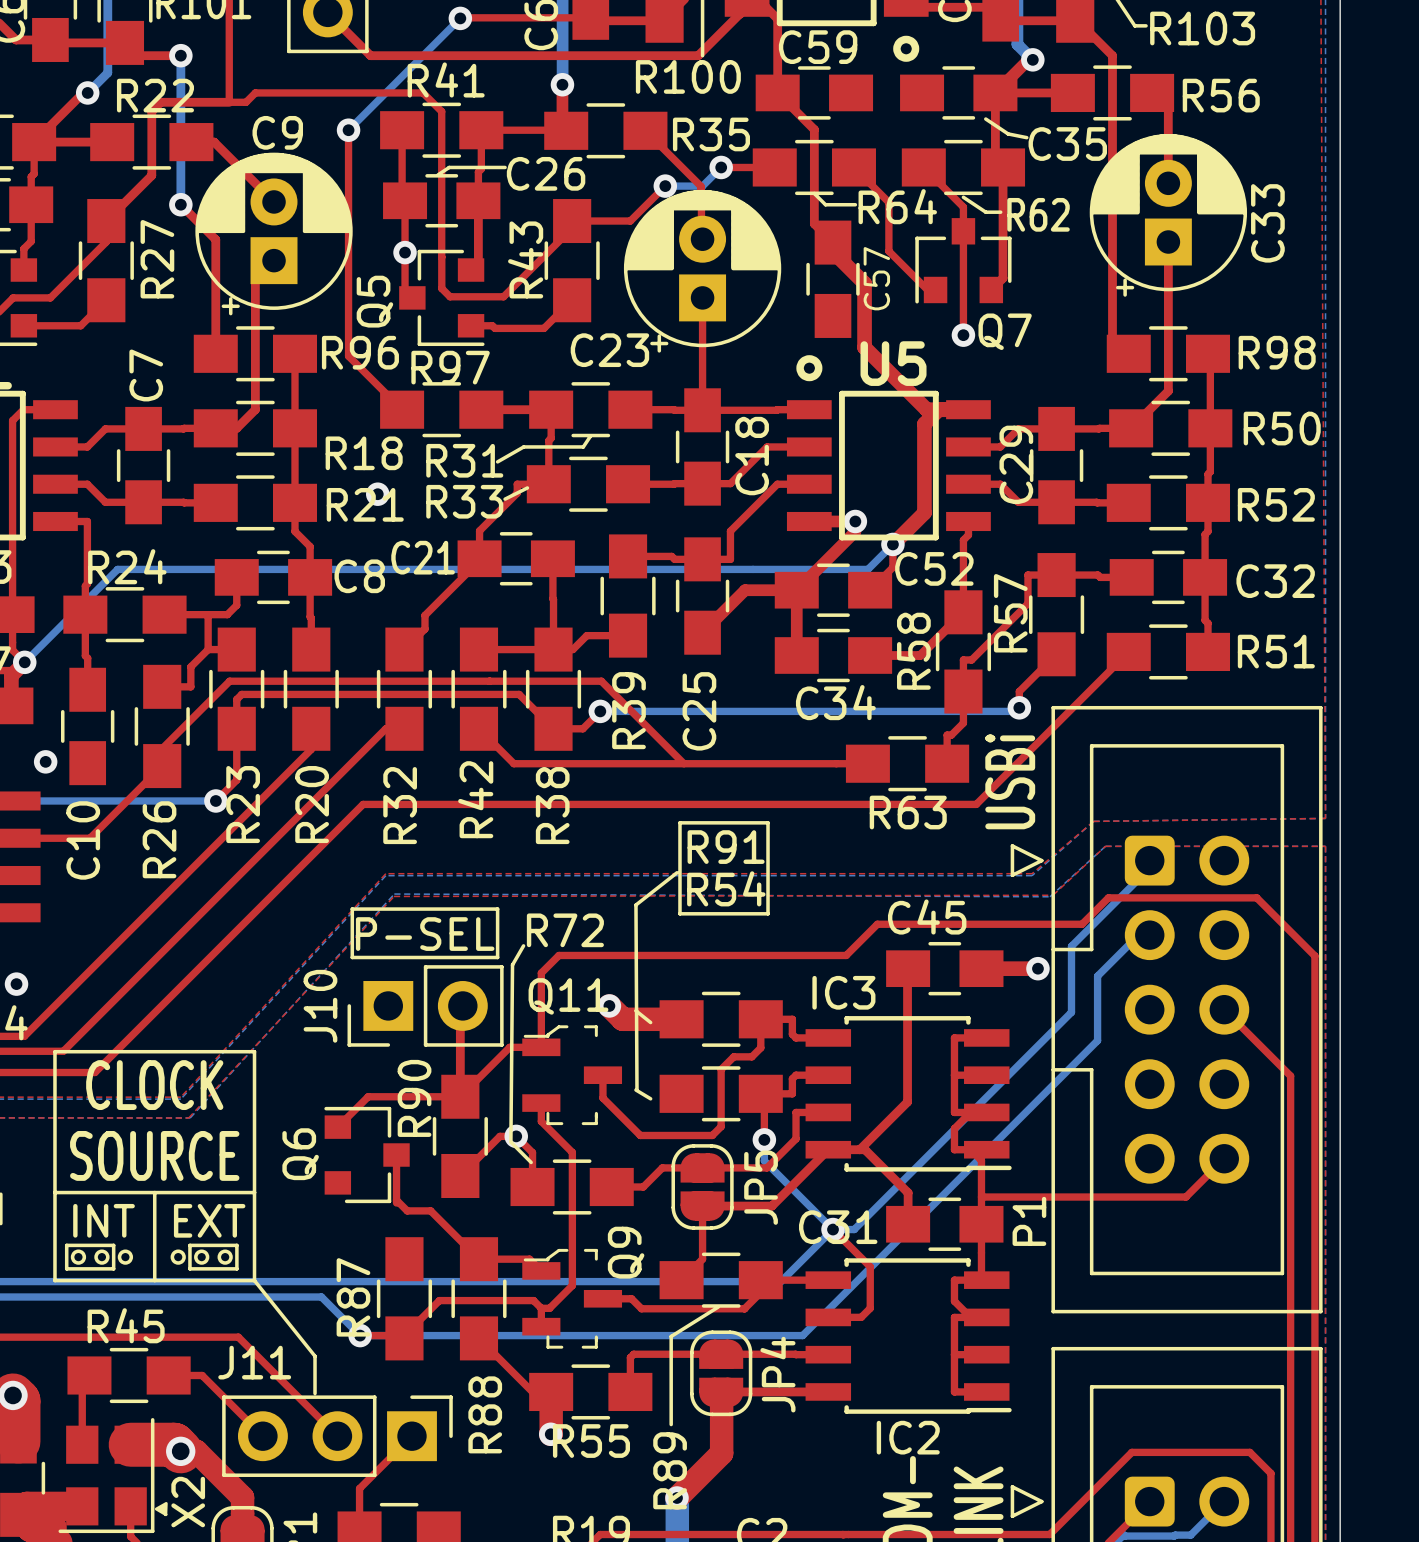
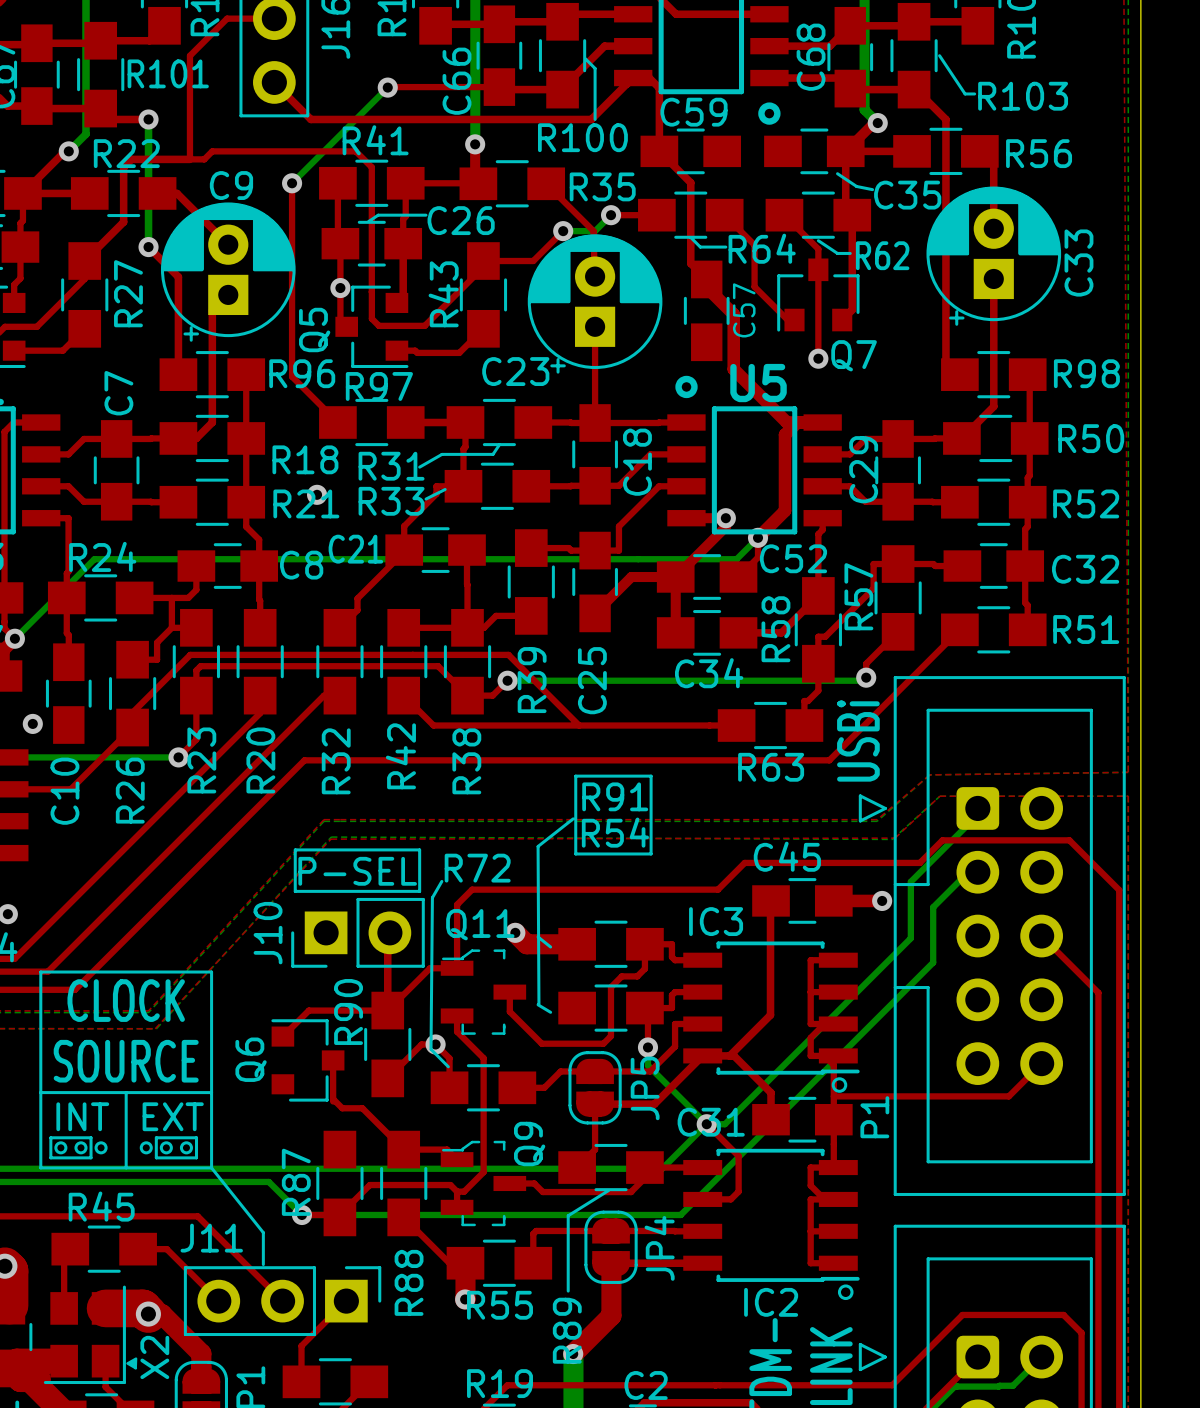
drawing: none -> [831, 1077, 848, 1093]
drawing: none -> [837, 1284, 854, 1301]

